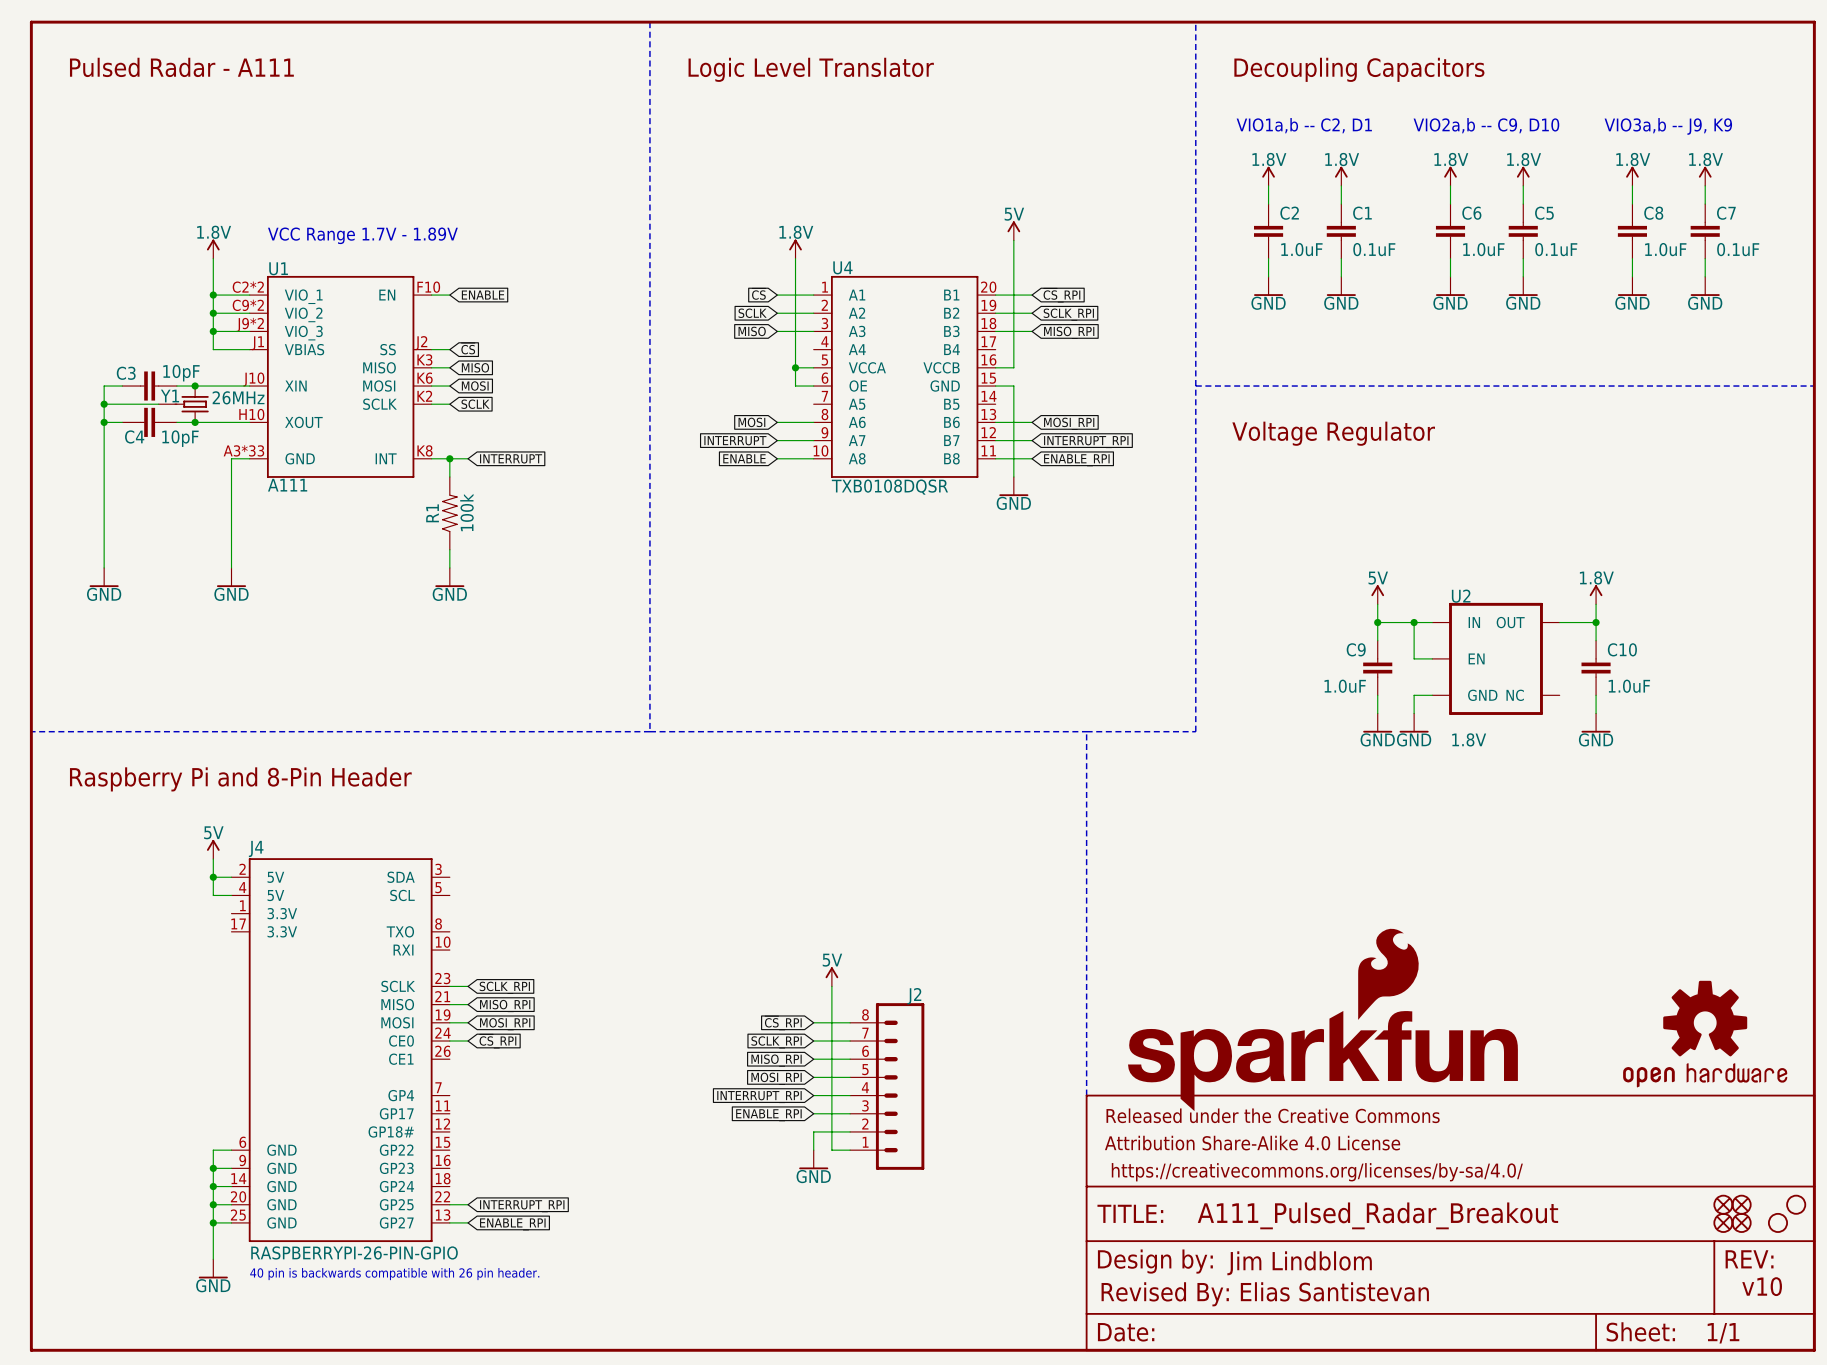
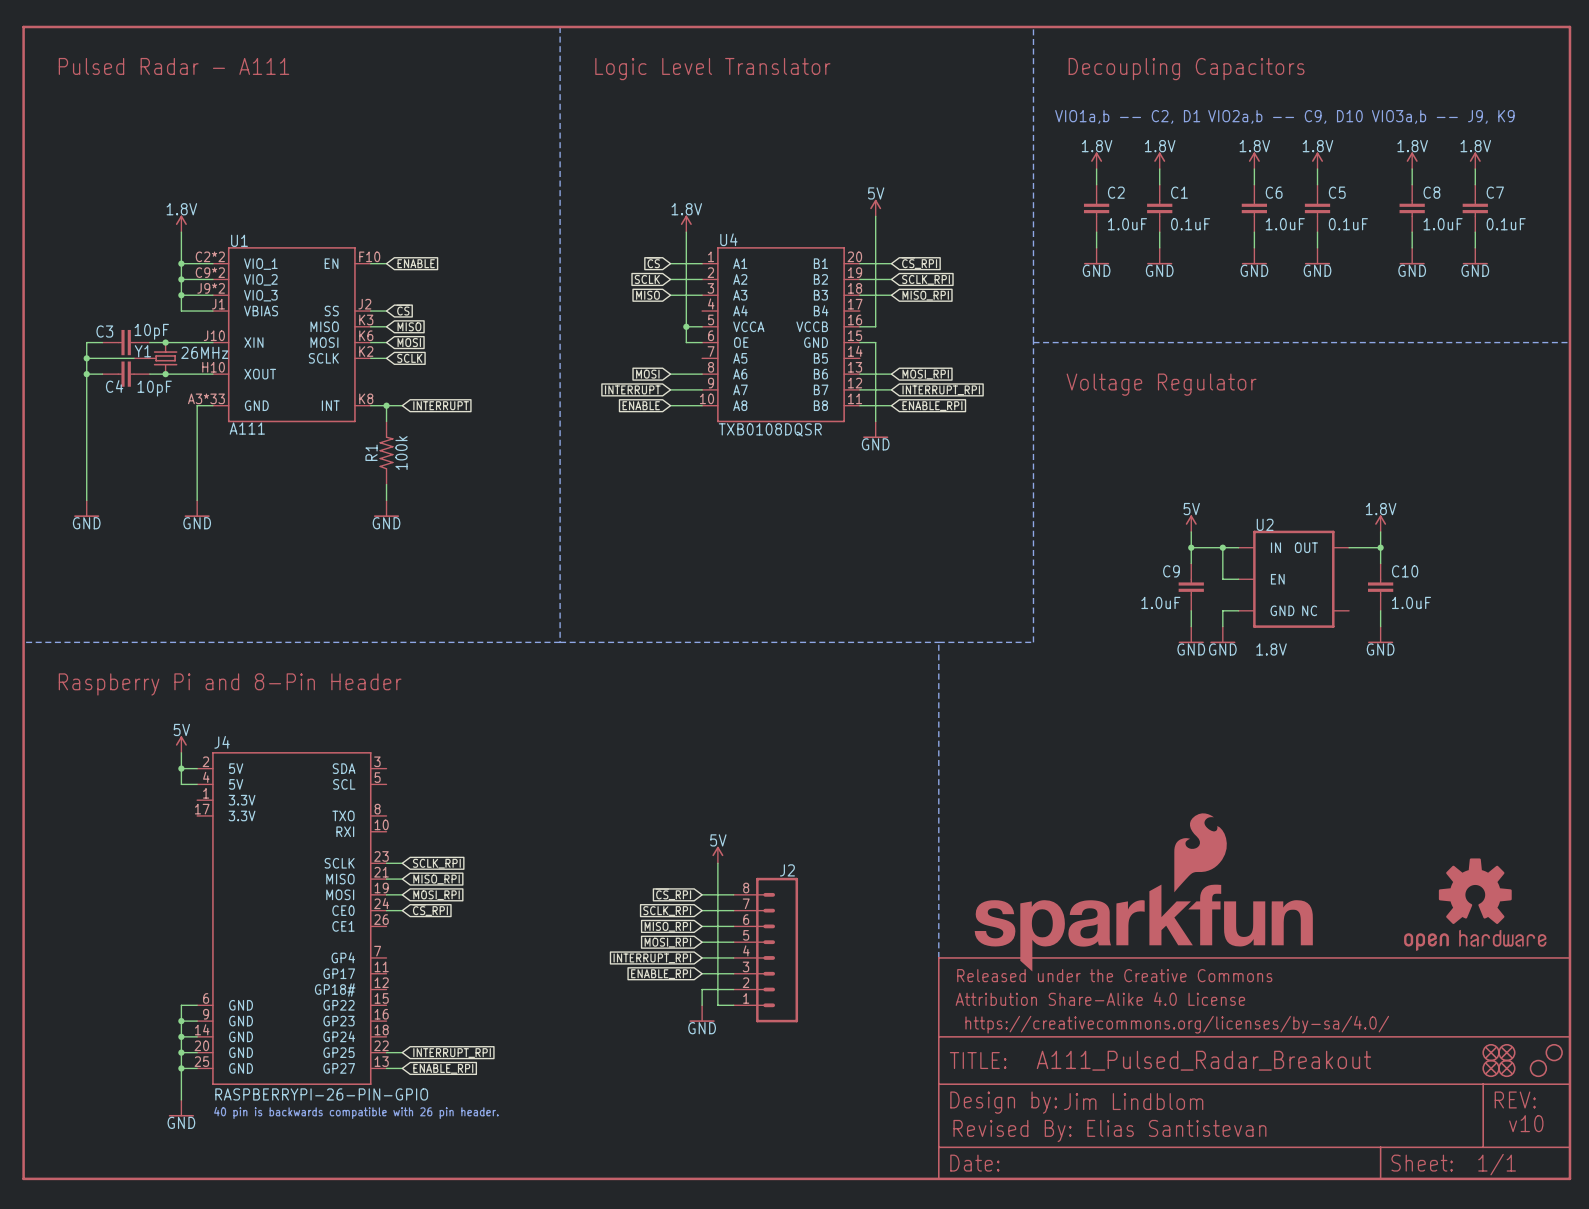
text: VCC Range 1.7V - 1.89V (362, 235) -> none

